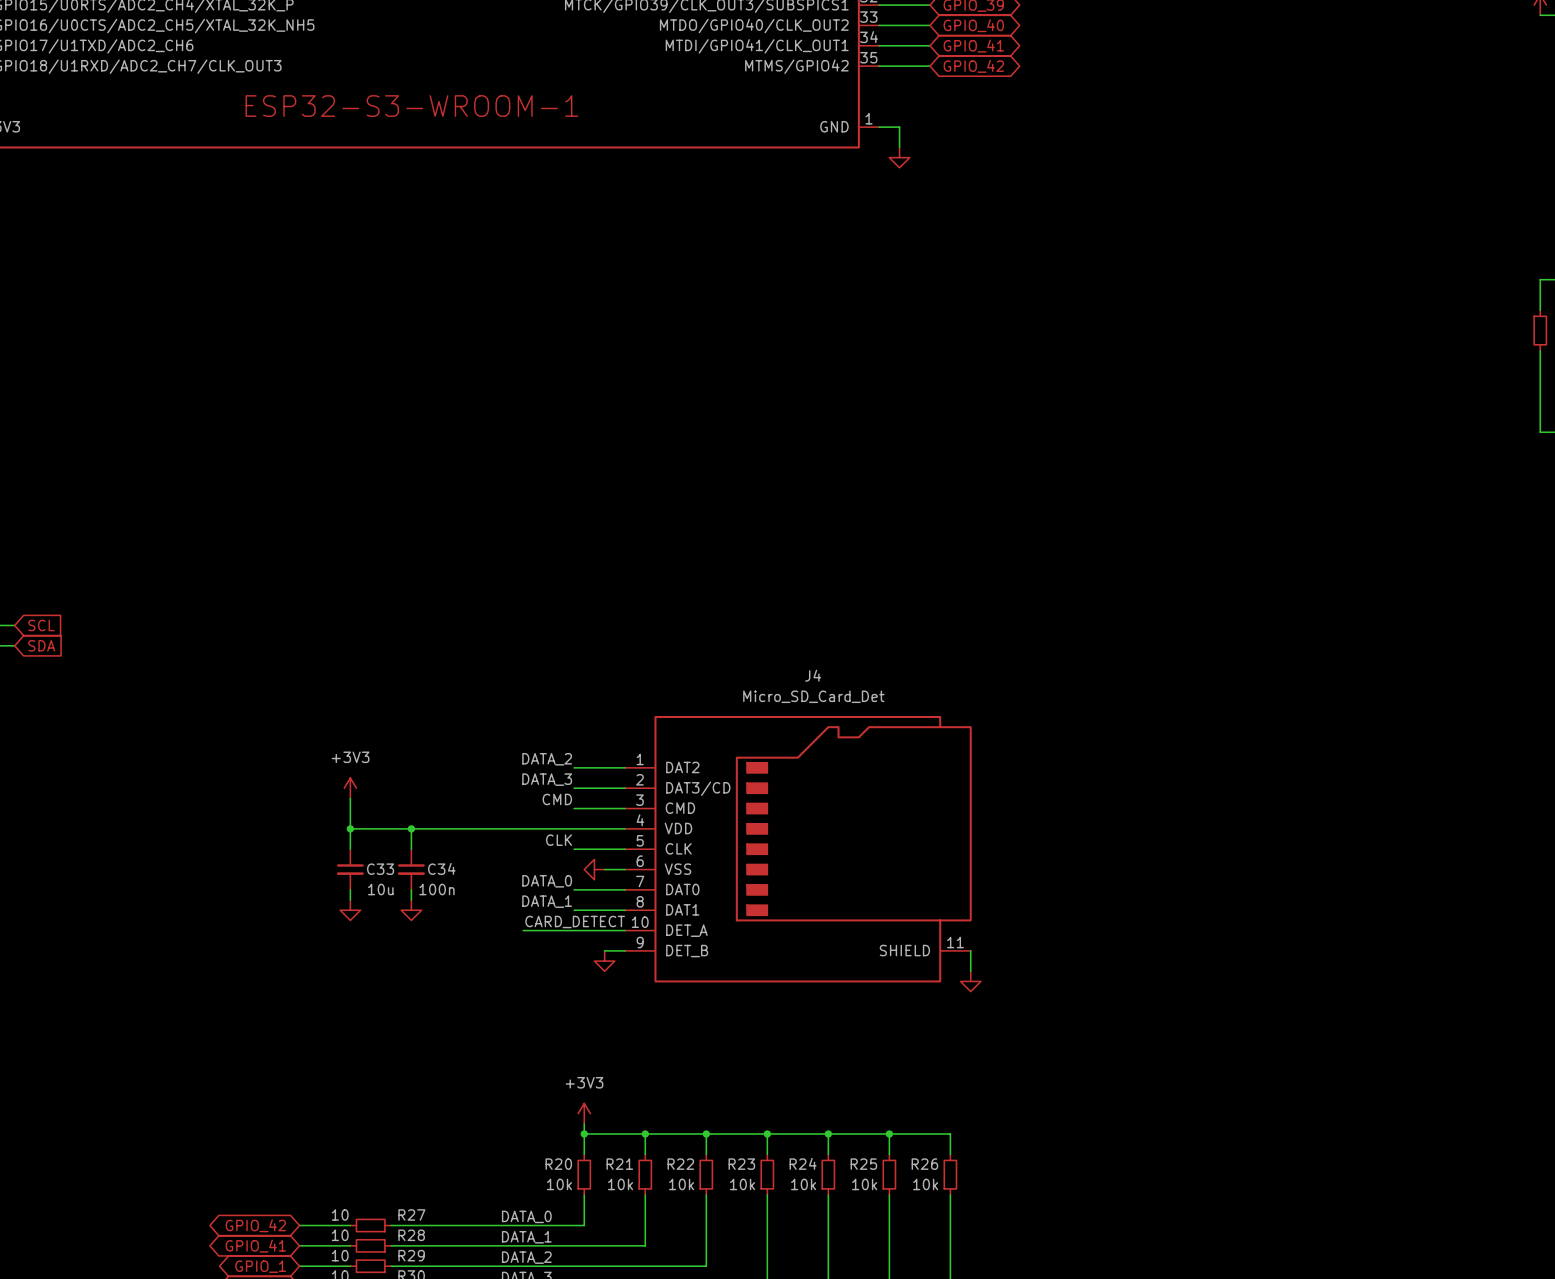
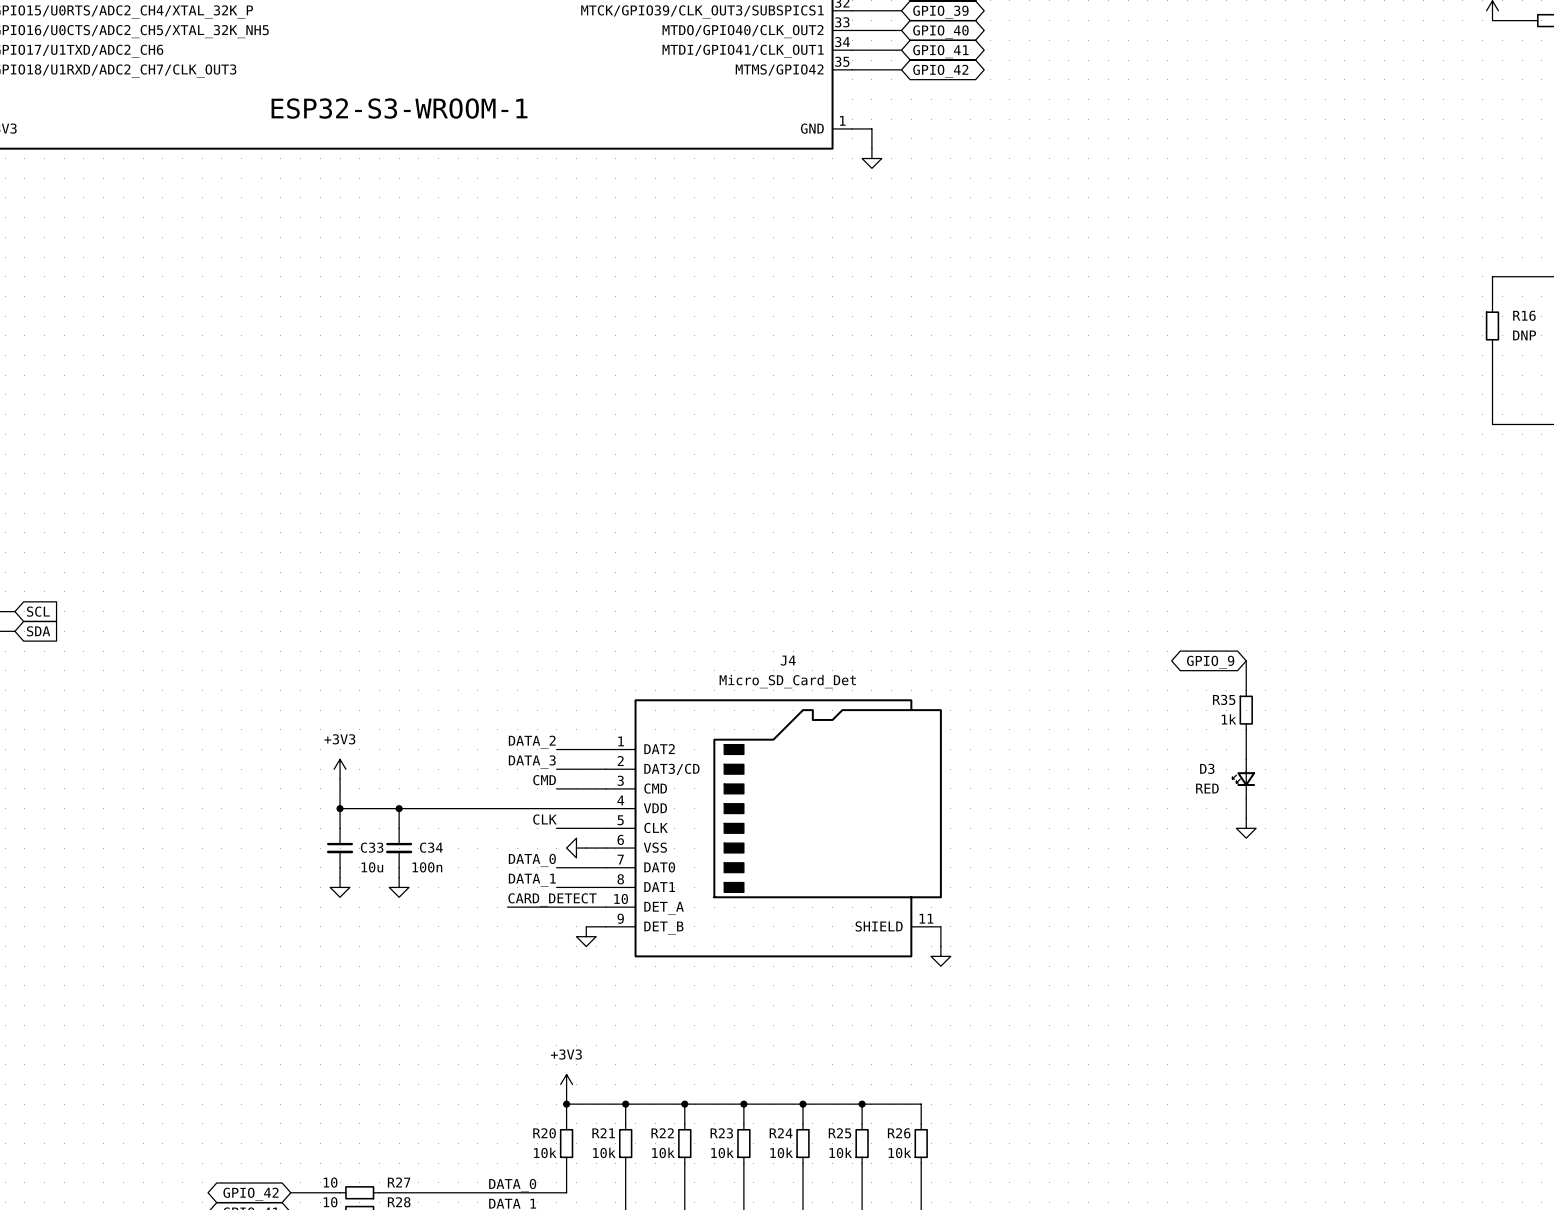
global label: none -> GPIO_9 (1210, 662)
wire: none -> (1246, 660) (1246, 690)
R35: none -> 1k (1246, 710)
wire: none -> (1246, 729) (1246, 759)
D3: none -> RED (1243, 779)
wire: none -> (1246, 798) (1246, 818)
power symbol: none -> (1246, 828)

